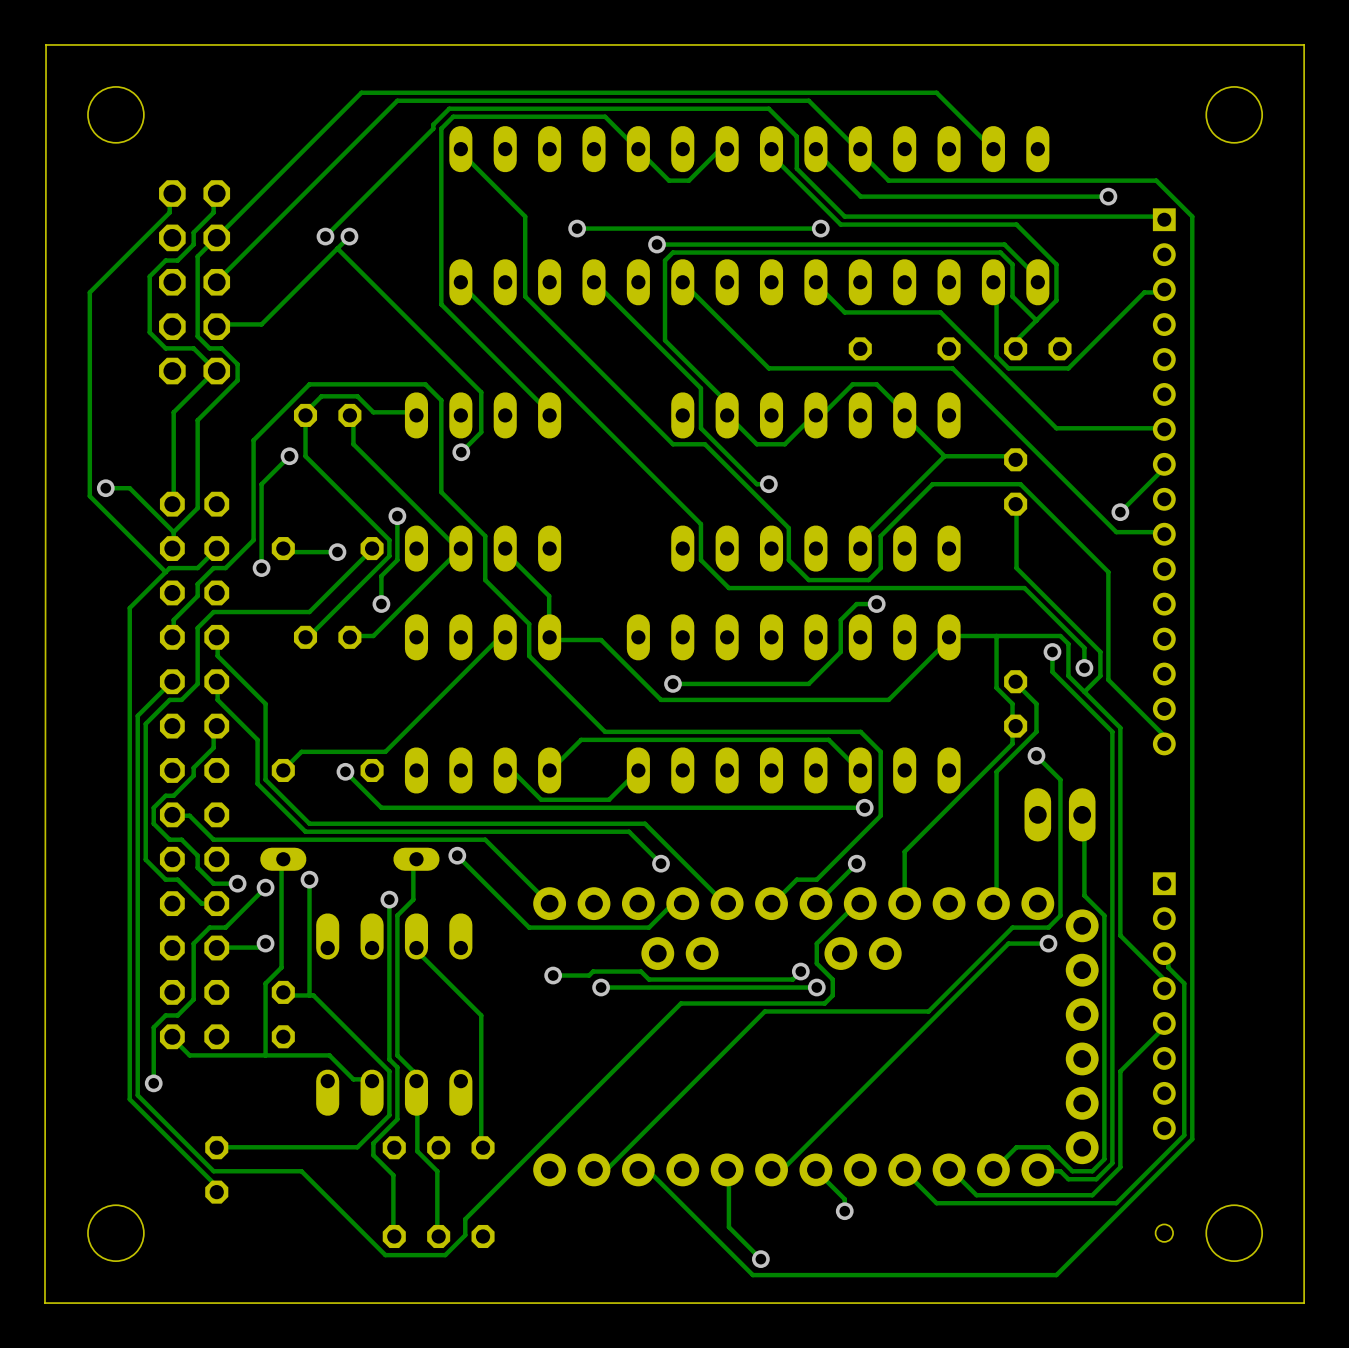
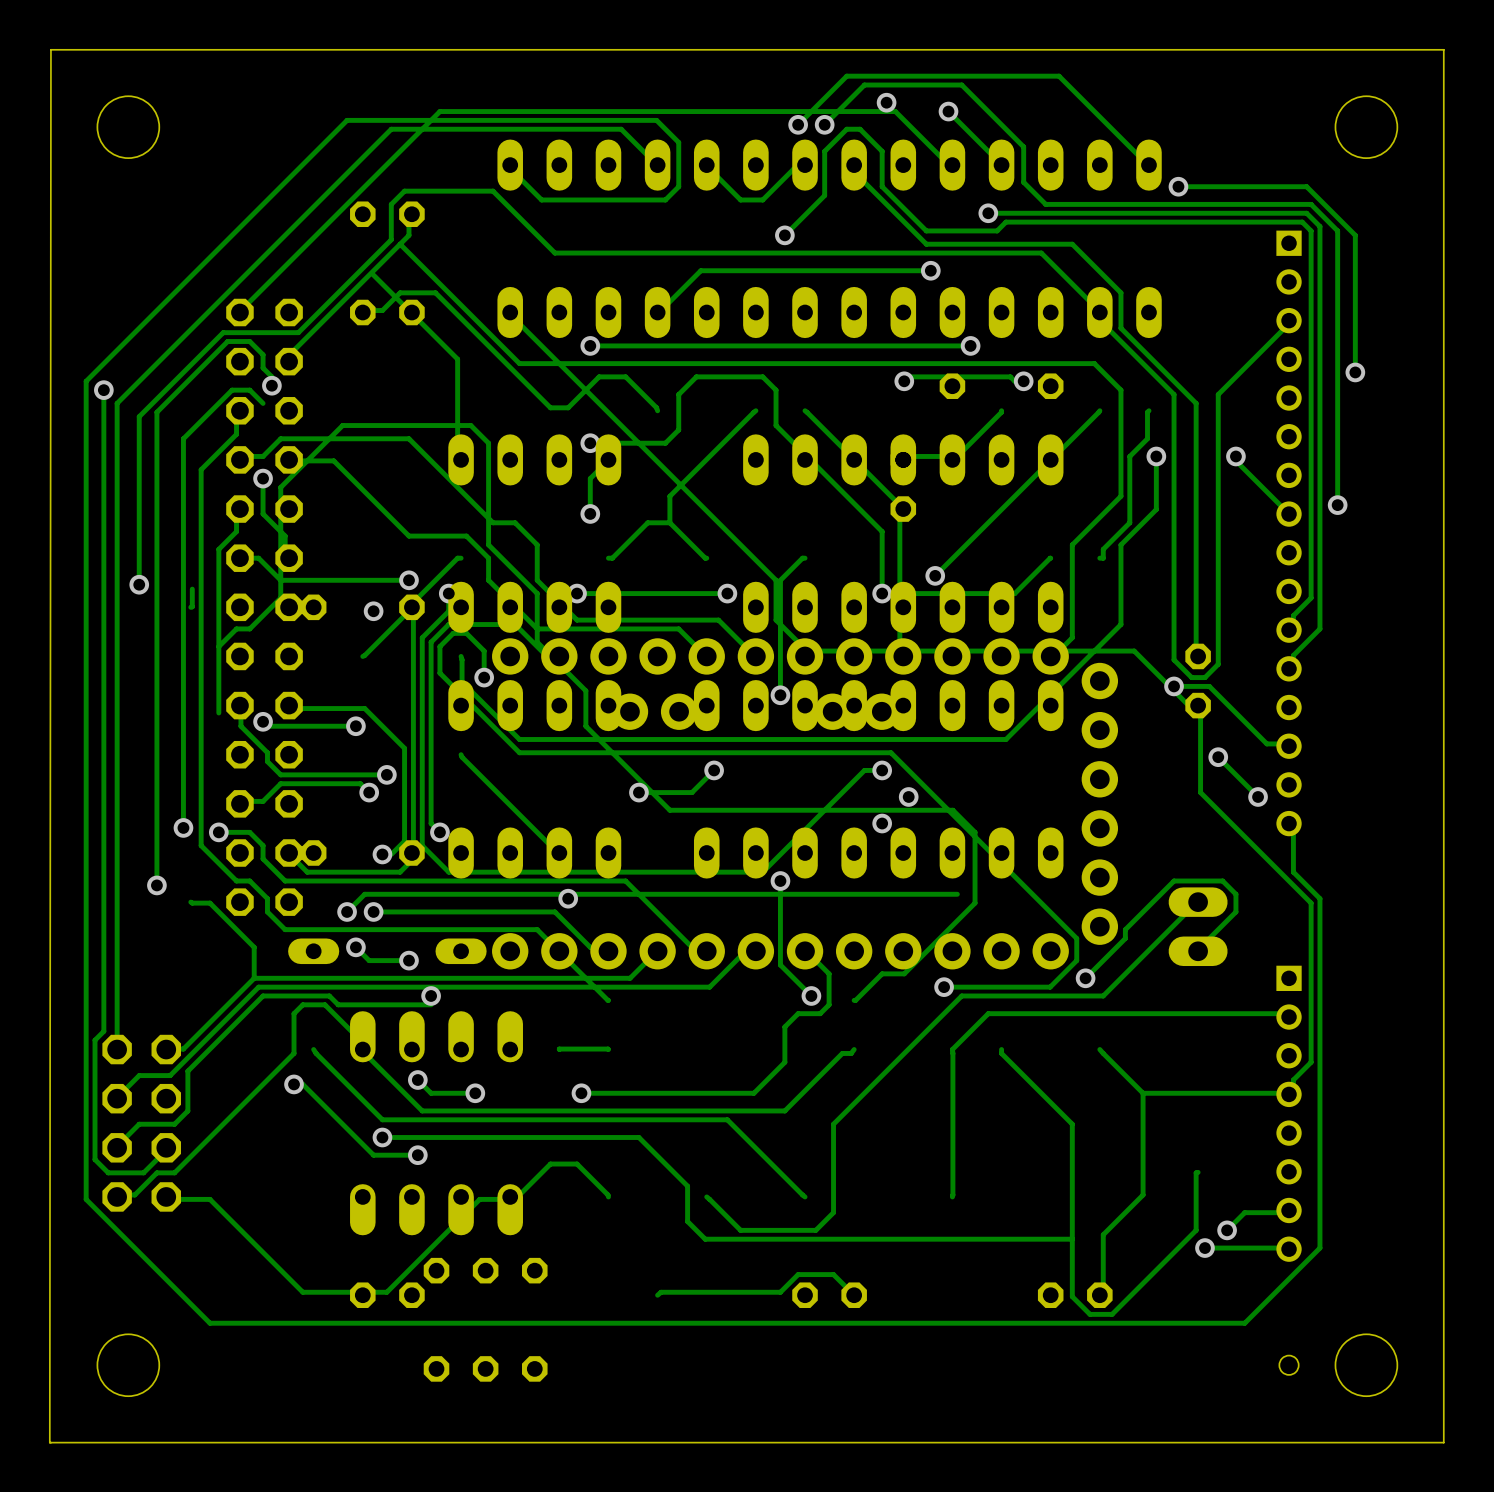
via: none -> (886, 102)
track: none -> (948, 111) (1001, 165)
via: none -> (948, 111)
track: (449, 108) (433, 124) (433, 128) (325, 236) -> (497, 120) (347, 120) (86, 381) (86, 1199) (209, 1323) (1081, 1323)
track: (593, 108) (768, 108) (776, 116) -> (784, 235) (824, 195) (824, 151) (846, 129) (860, 129)
track: none -> (798, 124) (846, 76) (1059, 76) (1148, 165)
via: none -> (798, 124)
track: none -> (824, 124) (864, 85) (961, 85) (1023, 146) (1023, 182) (1045, 204) (1311, 204) (1337, 230) (1337, 505)
via: none -> (824, 124)
track: (453, 116) (441, 128) (441, 304) (549, 412) (549, 415) -> (501, 129) (391, 129) (117, 403) (117, 1049)
track: (561, 116) (605, 116) (638, 149) -> (621, 129) (657, 165)
track: (815, 149) (816, 152) (860, 196) (1108, 196) -> none
track: (860, 149) (860, 152) (888, 180) (1156, 180) (1176, 200) -> none
track: (993, 149) (936, 92) (361, 92) (197, 256) (197, 336) (209, 348) (221, 348) (225, 352) -> (183, 827) (183, 438) (232, 390) (249, 390)
track: none -> (1178, 186) (1306, 186) (1355, 235) (1355, 372)
track: (489, 180) (525, 216) (525, 296) (673, 444) (704, 444) (788, 528) (788, 560) (808, 580) (868, 580) (880, 568) (880, 536) (932, 484) (1020, 484) (1108, 572) (1108, 679) (1164, 735) (1164, 743) -> (541, 199) (665, 199) (678, 186) (678, 142) (656, 120)
via: none -> (988, 213)
track: (172, 193) (169, 196) (169, 212) (89, 292) (89, 496) (165, 572) -> none
track: (216, 193) (213, 196) (213, 212) (193, 232) (193, 244) (177, 260) (165, 260) (149, 276) (149, 332) (165, 348) (193, 348) (216, 371) -> none
part: none -> (387, 214)
track: none -> (411, 214) (408, 217) (408, 235) (285, 359) (289, 361)
via position: (1108, 196) -> (1178, 186)
track: (836, 208) (844, 216) (1164, 216) (1164, 219) -> (926, 230) (997, 230) (1005, 222) (1302, 222)
track: (1184, 208) (1192, 216) -> (988, 213) (1306, 213) (1319, 226) (1319, 239)
track: none -> (1311, 230) (1311, 597) (1293, 615) (1293, 628) (1289, 630)
via: none -> (784, 235)
track: none -> (400, 244) (519, 363) (1094, 363) (1120, 390) (1120, 496) (1072, 544) (1072, 637) (1054, 655) (1050, 656)
track: (836, 220) (840, 224) (1016, 224) (1056, 264) (1056, 300) (1016, 340) (1015, 348) -> (926, 244) (1072, 244) (1107, 279)
track: none -> (638, 253) (554, 253) (493, 191) (404, 191) (391, 204) (391, 239) (298, 332) (223, 332) (139, 416) (139, 584)
via: (577, 228) -> none
track: none -> (908, 253) (1041, 253) (1099, 312)
via position: (820, 228) -> (930, 270)
via: (325, 236) -> none
track: (349, 236) (261, 324) (217, 324) (216, 326) -> none
via: (349, 236) -> none
via: (657, 244) -> none
track: (840, 244) (1004, 244) (1040, 280) (1037, 282) -> none
track: (1000, 252) (673, 252) (665, 260) (665, 340) (724, 400) (724, 412) (727, 415) (756, 444) (784, 444) (815, 415) -> none
part: (194, 282) -> none
track: none -> (362, 312) (364, 310) (382, 310) (400, 292) (435, 292) (550, 407) (568, 407) (599, 376) (625, 376) (657, 410)
part: none -> (387, 312)
track: (594, 282) (700, 388) (700, 428) (756, 484) (768, 484) -> (657, 312) (700, 270) (727, 270)
track: (682, 282) (768, 368) (952, 368) (1116, 532) (1164, 532) (1164, 534) -> none
track: (815, 282) (844, 312) -> (590, 345) (935, 345)
track: (1164, 292) (1144, 292) (1068, 368) (1008, 368) (996, 356) (996, 292) -> (1289, 323) (1218, 394) (1218, 664) (1204, 677) (1191, 677) (1174, 659) (1174, 394) (1103, 323)
via: none -> (590, 345)
track: (876, 312) (940, 312) (1056, 428) (1164, 429) -> none
via: none -> (970, 345)
track: none -> (1147, 354) (1196, 403) (1196, 655) (1198, 656)
track: (413, 324) (481, 392) (481, 432) (461, 452) -> (457, 359) (457, 456)
via: none -> (1355, 372)
via: none -> (904, 381)
track: none -> (1023, 381) (1014, 381) (1010, 376) (908, 376) (904, 381)
via: none -> (1023, 381)
track: none -> (271, 385) (271, 376) (263, 368) (263, 354) (249, 341) (227, 341) (156, 412) (156, 885)
via: none -> (271, 385)
part: (1037, 348) -> none
track: none -> (103, 390) (103, 1031) (95, 1040) (95, 1159) (108, 1172) (143, 1172) (165, 1150) (166, 1147)
via: none -> (103, 390)
track: (237, 364) (237, 380) (197, 420) (197, 496) -> (239, 509) (236, 509) (236, 531) (218, 549)
track: none -> (755, 410) (669, 496) (669, 522)
track: none -> (805, 410) (903, 509) (899, 509) (899, 655) (903, 656)
track: none -> (1099, 410) (935, 575)
track: none -> (1148, 410) (1147, 438) (1129, 456) (1129, 522) (1103, 549) (1103, 558) (1099, 558)
track: (213, 372) (173, 412) (172, 504) -> (236, 412) (236, 434) (201, 469) (201, 845) (236, 881) (249, 881) (267, 898) (267, 911) (285, 929)
track: (321, 396) (305, 412) (305, 456) (389, 540) (389, 556) (305, 639) (305, 637) -> (355, 438) (280, 438) (263, 456) (240, 456) (239, 459)
track: (357, 396) (373, 412) (413, 412) -> (395, 438) (408, 438) (493, 522) (515, 522) (537, 544) (537, 580) (577, 620) (718, 620) (755, 656)
track: none -> (590, 443) (665, 443) (678, 429) (678, 394) (696, 376) (762, 376) (776, 390) (776, 425) (882, 531) (882, 593)
via: none -> (590, 443)
track: (824, 412) (852, 384) (876, 384) (904, 412) (904, 416) (944, 456) -> (913, 456) (957, 456) (1001, 410)
track: none -> (1156, 456) (1156, 509) (1120, 544) (1120, 624) (1005, 739) (519, 739) (462, 682) (461, 656)
via: none -> (1156, 456)
via: none -> (1235, 456)
track: none -> (289, 459) (333, 460) (408, 536) (466, 536) (488, 558) (488, 580) (537, 628) (678, 628) (706, 656)
part: (327, 415) -> none
track: (349, 415) (353, 416) (353, 444) (457, 548) (460, 548) (373, 636) (349, 637) -> none
track: none -> (607, 460) (590, 478) (590, 513)
track: none -> (263, 478) (263, 513) (285, 536) (285, 558) (289, 558)
via: none -> (263, 478)
part: none -> (903, 484)
via: (461, 452) -> none
track: (289, 456) (261, 484) (261, 568) -> none
via: (289, 456) -> none
track: (944, 456) (1012, 456) (1015, 459) -> none
track: (944, 456) (860, 540) (860, 548) -> none
via: none -> (1337, 505)
via: none -> (590, 513)
track: (1164, 464) (1164, 468) (1120, 512) -> (1289, 513) (1235, 460) (1235, 456)
track: none -> (669, 522) (706, 558)
track: none -> (669, 522) (647, 522) (612, 558) (608, 558)
part: (1015, 481) -> none
via: (768, 484) -> none
track: (105, 488) (129, 488) (173, 532) (197, 508) -> (218, 646) (218, 562)
via position: (105, 488) -> (139, 584)
track: none -> (239, 558) (258, 558) (280, 580) (408, 580)
track: none -> (461, 558) (457, 558) (413, 602) (413, 858) (400, 872) (307, 872) (289, 853)
track: none -> (805, 558) (802, 558) (780, 580) (780, 695)
track: none -> (1050, 558) (1014, 593) (899, 593)
track: (1015, 504) (1016, 568) (1100, 651) (1100, 675) (1084, 691) -> none
via: (1120, 512) -> none
track: (397, 516) (397, 560) -> (448, 593) (448, 611) (439, 620)
via: (397, 516) -> none
via: none -> (935, 575)
via: none -> (408, 580)
via: none -> (448, 593)
via: none -> (577, 593)
track: none -> (727, 593) (577, 593)
via: none -> (727, 593)
via: none -> (882, 593)
track: (216, 548) (197, 568) (169, 568) (129, 608) (129, 1099) (213, 1183) (213, 1191) (216, 1192) -> none
track: (283, 548) (285, 552) (337, 552) -> none
track: (505, 548) (505, 552) (549, 596) (549, 637) (553, 639) (601, 639) (661, 699) (888, 699) (948, 639) (949, 637) (952, 636) (1060, 636) (1068, 643) (1068, 675) (1120, 727) (1120, 935) (1164, 979) (1164, 987) -> (1143, 1093) (1289, 1093)
via: (261, 568) -> none
track: (1192, 568) (1192, 811) -> (1289, 823) (1293, 827) (1293, 872) (1319, 898)
track: none -> (1319, 628) (1293, 655) (1293, 668) (1289, 668)
track: (329, 592) (309, 612) (213, 612) (197, 628) -> (364, 655) (362, 656)
track: none -> (559, 656) (546, 655) (515, 624) (448, 624) (431, 642) (431, 823) (439, 832)
track: (197, 596) (173, 620) (172, 637) -> (218, 659) (218, 695)
track: none -> (422, 668) (422, 845) (448, 872) (762, 872) (864, 770) (882, 770)
via: (381, 604) -> none
track: (876, 604) (856, 604) (840, 620) (840, 651) (808, 683) (673, 683) -> none
via: (876, 604) -> none
track: none -> (484, 677) (484, 651) (466, 633) (453, 633) (439, 646) (439, 673) (519, 752) (891, 752) (1076, 938) (1076, 960) (1050, 987) (944, 987)
via: none -> (484, 677)
part: none -> (1198, 681)
track: none -> (1174, 686) (1209, 686) (1266, 743) (1289, 743) (1289, 746)
via: none -> (1174, 686)
via: none -> (780, 695)
track: (996, 636) (996, 687) (1012, 703) (1012, 723) (1015, 726) (1012, 727) (1012, 743) (904, 851) (904, 903) -> none
track: none -> (289, 705) (289, 708) (364, 708) (404, 748) (404, 841) (391, 854)
part: (327, 637) -> none
track: (505, 637) (505, 639) (497, 639) (385, 751) (301, 751) (283, 770) -> none
track: (197, 643) (197, 683) (181, 699) (169, 699) (145, 723) (145, 859) (165, 879) (177, 879) (201, 903) (216, 903) -> none
track: none -> (263, 721) (267, 726) (355, 726)
via: none -> (263, 721)
track: (1052, 651) (1052, 671) (1112, 731) (1112, 1163) (1096, 1179) (1068, 1179) (1060, 1171) (1037, 1169) -> none
via: (1052, 651) -> none
via: none -> (355, 726)
track: none -> (1200, 739) (1200, 792) (1311, 903) (1311, 1062) (1293, 1080) (1293, 1093) (1289, 1094)
via position: (1084, 667) -> (1218, 757)
track: (241, 679) (265, 703) (265, 779) (309, 823) (337, 823) -> (267, 752) (267, 761) (280, 774) (386, 774)
track: (172, 681) (137, 715) (137, 1095) (213, 1171) (301, 1171) (385, 1255) (445, 1255) (465, 1235) (465, 1219) (680, 1003) -> (117, 1196) (117, 1194) (134, 1194) (156, 1172) (174, 1172) (294, 1053) (294, 1013) (302, 1004) (324, 1004) (360, 1040) (360, 1049) (422, 1110) (753, 1110)
track: (216, 681) (217, 699) (257, 739) (257, 783) (305, 831) (629, 831) (661, 863) -> none
track: none -> (461, 754) (559, 854)
track: (1015, 681) (1036, 703) (1036, 731) (996, 771) (996, 903) (993, 903) -> none
via position: (673, 683) -> (714, 770)
track: none -> (1218, 757) (1258, 796)
track: none -> (714, 770) (692, 792) (638, 792)
via: none -> (882, 770)
via: none -> (386, 774)
part: (1015, 703) -> none
via: none -> (369, 792)
via: none -> (638, 792)
via: none -> (908, 796)
via: none -> (1258, 796)
track: (216, 726) (213, 727) (213, 747) (193, 767) (193, 775) (173, 795) (165, 795) (153, 807) (153, 823) (169, 839) (181, 839) (197, 855) (197, 867) (213, 883) (229, 883) -> (239, 803) (240, 801) (263, 801) (280, 783) (360, 783) (369, 792)
via: none -> (882, 823)
via: none -> (183, 827)
track: none -> (218, 832) (249, 832) (263, 845) (263, 858) (285, 881) (625, 881) (692, 947) (705, 947) (706, 951)
via: none -> (218, 832)
via: none -> (439, 832)
track: (1036, 755) (1060, 779) (1060, 915) (1048, 927) (1012, 927) (928, 1011) (764, 1011) (609, 1167) -> (854, 1295) (833, 1274) (798, 1274) (780, 1292) (674, 1292)
via: (1036, 755) -> none
part position: (194, 770) -> (264, 607)
track: (638, 770) (609, 799) (541, 799) (513, 771) (505, 770) -> none
track: (860, 770) (828, 739) (581, 739) (549, 770) -> none
track: (345, 771) (381, 807) -> (347, 911) (364, 894) (422, 894)
track: none -> (780, 881) (780, 965) (811, 995)
via: none -> (780, 881)
via: none -> (156, 885)
via: (864, 807) -> none
via: none -> (568, 898)
part rotation: 0° (1060, 814) -> 90° clockwise (1198, 926)
track: (1082, 814) (1084, 815) (1084, 895) (1104, 915) (1104, 1159) (1092, 1171) (1072, 1171) (1048, 1147) (1016, 1147) (996, 1167) -> (1143, 1093) (1143, 1194) (1103, 1234) (1103, 1292)
track: none -> (1198, 902) (1103, 995) (961, 995) (833, 1124) (833, 1212) (815, 1230) (740, 1230) (706, 1196)
via: none -> (347, 911)
via: none -> (373, 911)
track: (501, 823) (645, 823) (724, 903) (727, 903) -> (554, 911) (590, 947) (607, 947) (608, 951)
track: (257, 839) (213, 839) -> (166, 1049) (183, 1049) (254, 978) (254, 947) (236, 929)
track: none -> (355, 947) (369, 960) (408, 960)
via: (457, 855) -> none
track: (283, 859) (281, 859) (281, 967) (265, 983) (265, 1055) -> none
track: (416, 859) (413, 859) (413, 899) (397, 915) (397, 1055) (413, 1071) (413, 1079) (417, 1083) (417, 1151) (437, 1171) (438, 1236) -> none
track: (460, 859) (529, 927) (649, 927) (673, 903) (682, 903) -> none
track: none -> (657, 951) (630, 978) (263, 978)
track: none -> (755, 951) (745, 951) (709, 987) (258, 987) (170, 1075) (139, 1075) (117, 1098)
track: none -> (1198, 951) (1235, 911) (1235, 894) (1222, 881) (1174, 881) (1125, 929) (1125, 938) (1085, 978)
via: (661, 863) -> none
track: (856, 863) (815, 903) -> none
via position: (856, 863) -> (944, 987)
via: none -> (408, 960)
track: (309, 879) (309, 995) -> none
via position: (309, 879) -> (355, 947)
via: (237, 883) -> none
via: none -> (1085, 978)
track: (265, 887) (225, 927) (209, 927) -> (431, 1004) (338, 1004) (329, 995) (263, 995) (232, 1026)
via: (265, 887) -> none
track: (389, 899) (389, 1059) (397, 1067) (397, 1119) -> (608, 1196) (577, 1164) (550, 1164) (519, 1194) (510, 1194) (506, 1199) (479, 1199) (439, 1239)
via: none -> (811, 995)
track: (860, 903) (856, 903) (816, 943) (816, 963) (832, 979) (832, 995) (824, 1003) (708, 1003) -> (854, 1049) (851, 1053) (842, 1053) (784, 1110)
track: none -> (1289, 1017) (1289, 1013) (988, 1013) (952, 1049) (952, 1196)
track: (193, 943) (193, 999) (177, 1015) (165, 1015) (153, 1027) (153, 1083) -> (214, 1044) (187, 1071) (187, 1110) (174, 1124) (139, 1124) (117, 1147)
track: (265, 943) (261, 947) (216, 948) -> none
via position: (265, 943) -> (294, 1084)
track: (1048, 943) (1008, 943) (784, 1167) (772, 1167) (771, 1169) -> none
via: (1048, 943) -> none
track: none -> (313, 1049) (382, 1119) (727, 1119) (805, 1196)
track: (416, 948) (417, 951) (481, 1015) (481, 1147) (483, 1147) -> none
track: none -> (608, 1049) (559, 1049)
track: none -> (1001, 1049) (1001, 1053) (1072, 1124) (1072, 1296) (1090, 1314) (1112, 1314) (1196, 1230) (1196, 1172) (1198, 1172)
track: none -> (1099, 1049) (1143, 1093)
track: (1164, 953) (1168, 955) (1168, 967) (1184, 983) (1184, 1135) -> (1319, 1248) (1311, 1256)
track: (800, 971) (792, 979) (649, 979) (641, 971) (593, 971) (589, 975) (553, 975) -> none
via: (800, 971) -> none
track: none -> (417, 1080) (431, 1093) (475, 1093)
via: none -> (417, 1080)
via position: (553, 975) -> (581, 1093)
track: none -> (294, 1084) (302, 1084) (373, 1155) (417, 1155)
via: none -> (475, 1093)
track: none -> (665, 1093) (581, 1093)
via: (601, 987) -> none
track: (816, 987) (680, 987) -> (805, 951) (829, 973) (829, 1004) (820, 1013) (798, 1013) (784, 1026) (784, 1062) (753, 1093)
via: (816, 987) -> none
track: (283, 992) (285, 995) (313, 995) (389, 1071) (389, 1115) (357, 1147) (216, 1147) -> none
part: none -> (141, 1123)
part: (283, 1014) -> none
track: (1164, 1023) (1164, 1027) (1120, 1071) (1120, 1167) (1092, 1195) -> (1244, 1323) (1209, 1323)
track: none -> (382, 1137) (638, 1137) (687, 1186) (687, 1221) (705, 1239) (1072, 1239)
via: none -> (382, 1137)
track: (172, 1036) (189, 1055) (329, 1055) (353, 1079) (369, 1079) (372, 1081) -> none
part position: (815, 1036) -> (805, 803)
via: none -> (417, 1155)
via: (153, 1083) -> none
track: none -> (1289, 1210) (1289, 1212) (1244, 1212) (1227, 1230)
via: none -> (1227, 1230)
track: none -> (1204, 1248) (1289, 1249)
via: none -> (1204, 1248)
track: (1192, 1127) (1192, 1139) (1056, 1275) (752, 1275) (649, 1171) (638, 1169) -> none
track: (373, 1143) (373, 1155) (393, 1175) (394, 1236) -> (413, 1265) (386, 1292) (364, 1292) (362, 1295) (360, 1292) (302, 1292) (209, 1199) (170, 1199) (166, 1196)
part: (216, 1169) -> none
part: none -> (387, 1295)
track: (727, 1169) (728, 1171) (728, 1227) (760, 1259) -> none
part: none -> (829, 1295)
track: (815, 1169) (844, 1199) (844, 1211) -> none
track: (904, 1169) (936, 1203) (1116, 1203) (1124, 1195) -> none
track: (949, 1169) (976, 1195) -> none
part: none -> (1075, 1295)
via: (844, 1211) -> none
via: (760, 1259) -> none

